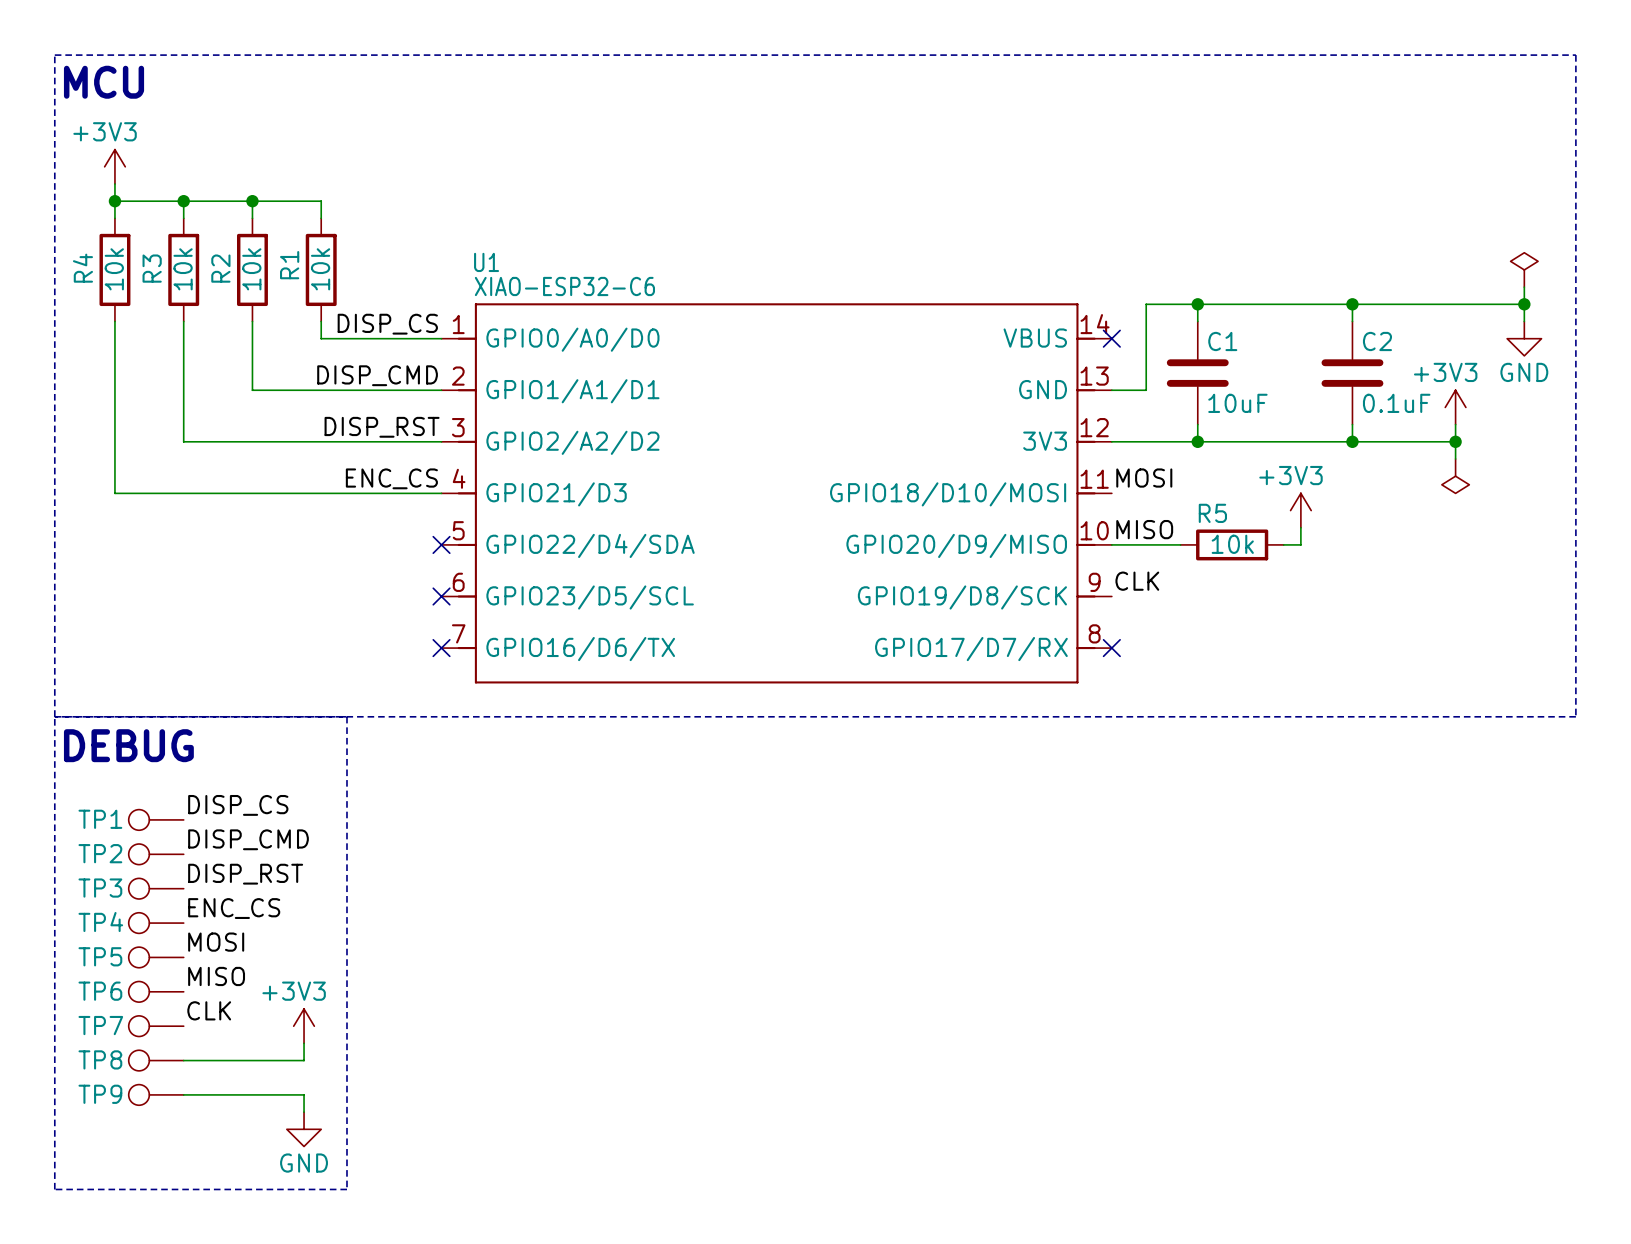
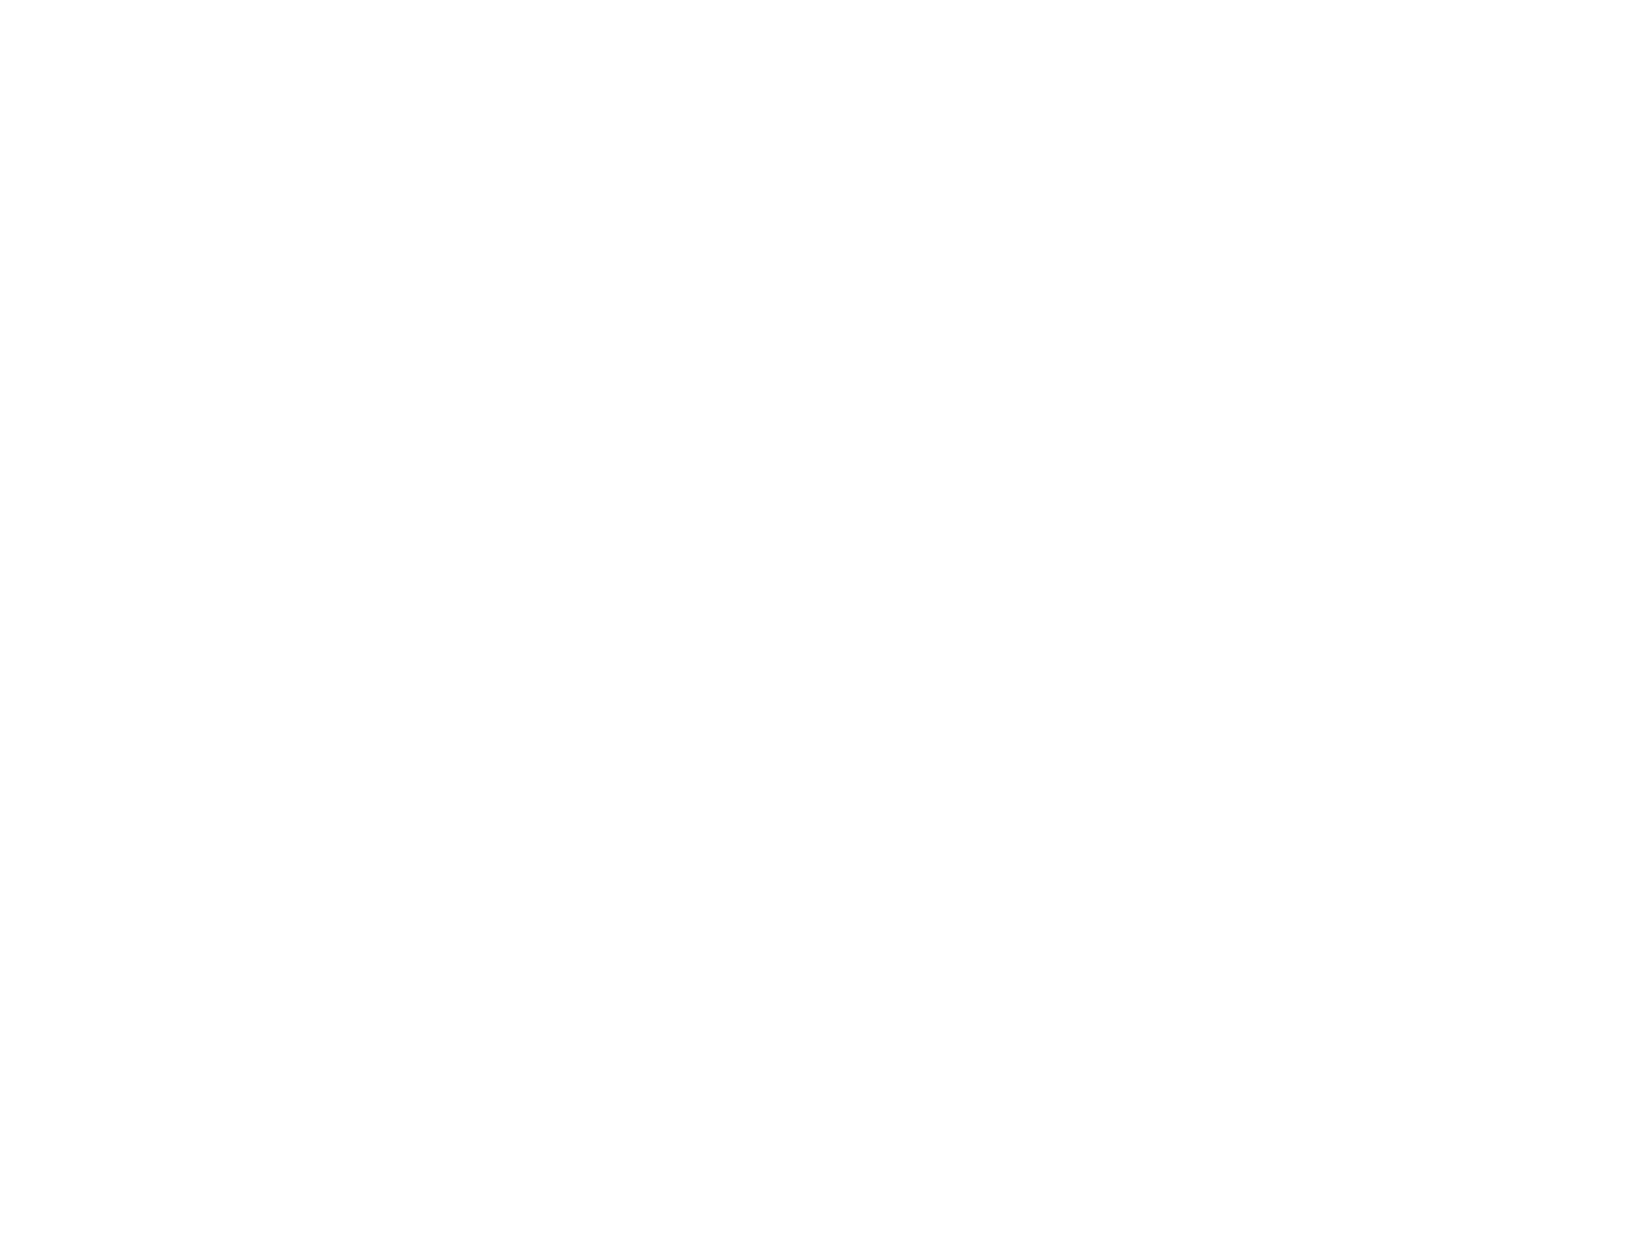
text: MCU (104, 82) -> none
power symbol: +3V3 (114, 166) -> none
wire: (114, 184) (114, 218) -> none
wire: (114, 201) (321, 201) (321, 218) -> none
junction: (114, 201) -> none
wire: (183, 201) (183, 218) -> none
junction: (183, 201) -> none
wire: (252, 201) (252, 218) -> none
junction: (252, 201) -> none
R4: 10k (114, 269) -> none
R3: 10k (183, 269) -> none
R2: 10k (252, 269) -> none
R1: 10k (321, 269) -> none
power symbol: (1524, 269) -> none
wire: (1524, 287) (1524, 321) -> none
wire: (1197, 304) (1197, 321) -> none
junction: (1197, 304) -> none
wire: (1352, 304) (1352, 321) -> none
junction: (1352, 304) -> none
wire: (1524, 304) (1146, 304) (1146, 390) (1111, 390) -> none
junction: (1524, 304) -> none
wire: (114, 321) (114, 493) (441, 493) -> none
wire: (183, 321) (183, 441) (441, 441) -> none
wire: (252, 321) (252, 390) (441, 390) -> none
wire: (321, 321) (321, 338) (441, 338) -> none
label: DISP_CS (387, 324) -> none
no-connect mark: (1111, 338) -> none
power symbol: GND (1524, 338) -> none
C1: 10uF (1197, 373) -> none
C2: 0.1uF (1352, 373) -> none
label: DISP_CMD (377, 375) -> none
power symbol: +3V3 (1455, 407) -> none
wire: (1197, 424) (1197, 441) -> none
wire: (1352, 424) (1352, 441) -> none
wire: (1455, 424) (1455, 459) -> none
label: DISP_RST (382, 427) -> none
wire: (1111, 441) (1455, 441) -> none
junction: (1197, 441) -> none
junction: (1352, 441) -> none
junction: (1455, 441) -> none
power symbol: (1455, 476) -> none
label: ENC_CS (391, 478) -> none
label: MOSI (1144, 478) -> none
U1: XIAO-ESP32-C6 (776, 493) -> none
power symbol: +3V3 (1300, 510) -> none
wire: (1300, 527) (1300, 544) (1283, 544) -> none
label: MISO (1144, 529) -> none
no-connect mark: (441, 544) -> none
wire: (1111, 544) (1180, 544) -> none
R5: 10k (1232, 544) -> none
label: CLK (1137, 581) -> none
no-connect mark: (441, 596) -> none
no-connect mark: (441, 648) -> none
no-connect mark: (1111, 648) -> none
line: (54, 716) (1575, 716) (1575, 55) (54, 55) (54, 1189) (346, 1189) (346, 716) -> none
text: DEBUG (128, 745) -> none
label: DISP_CS (238, 805) -> none
TP1: (156, 819) -> none
label: DISP_CMD (248, 839) -> none
TP2: (156, 854) -> none
label: DISP_RST (245, 874) -> none
TP3: (156, 888) -> none
label: ENC_CS (234, 908) -> none
TP4: (156, 923) -> none
label: MOSI (216, 942) -> none
TP5: (156, 957) -> none
label: MISO (216, 976) -> none
TP6: (156, 991) -> none
label: CLK (209, 1010) -> none
TP7: (156, 1026) -> none
power symbol: +3V3 (304, 1026) -> none
wire: (304, 1043) (304, 1060) (183, 1060) -> none
TP8: (156, 1060) -> none
TP9: (156, 1094) -> none
wire: (183, 1094) (304, 1094) (304, 1112) -> none
power symbol: GND (304, 1129) -> none

